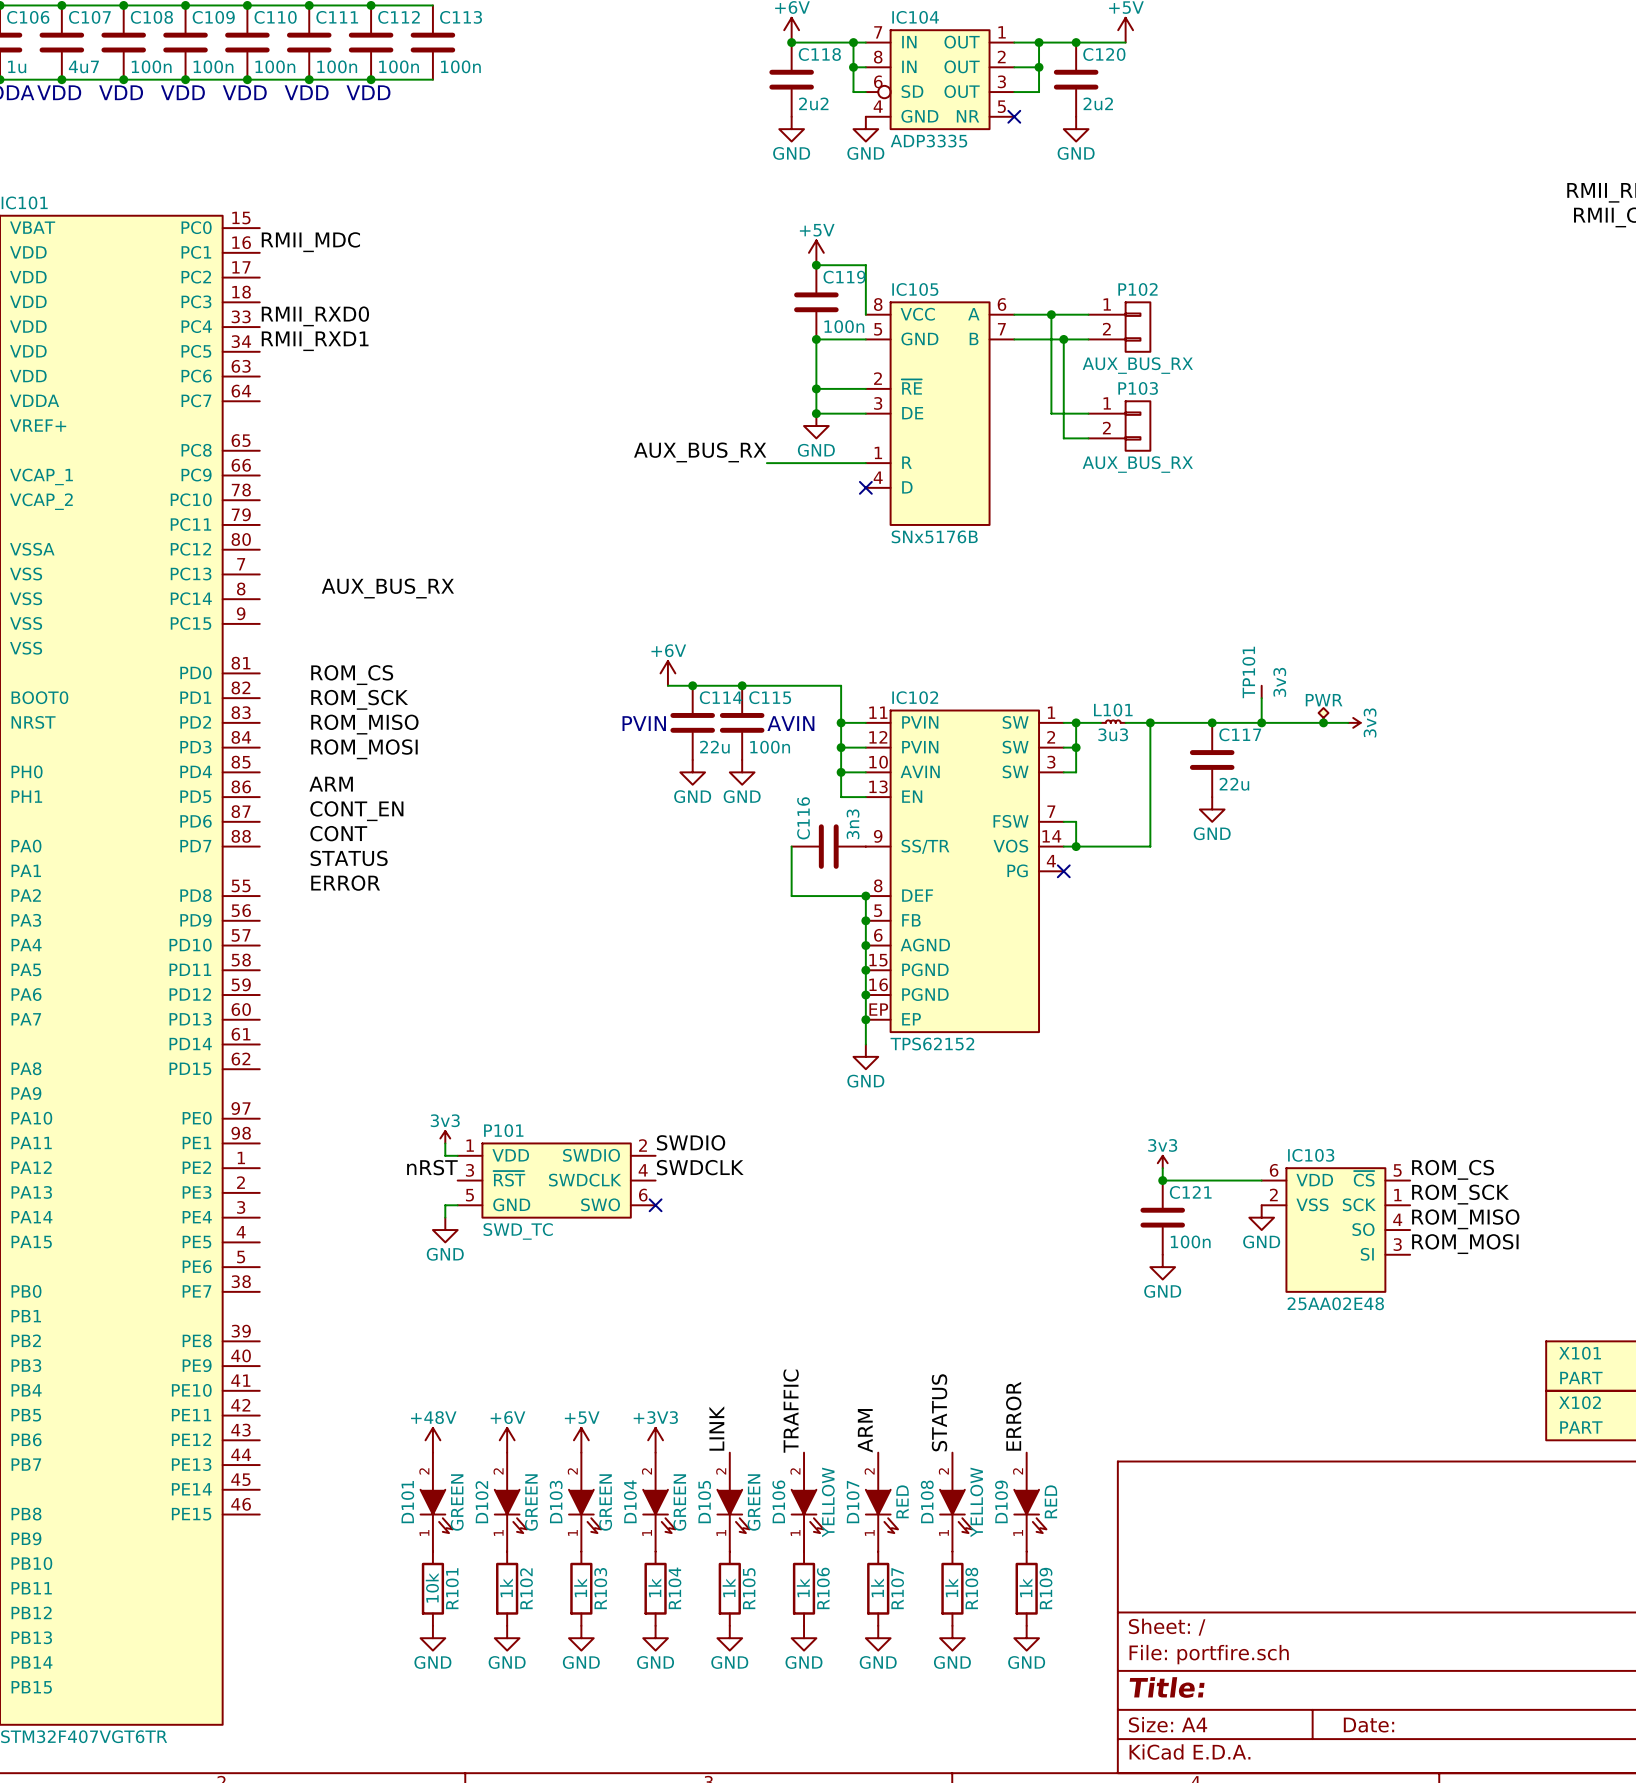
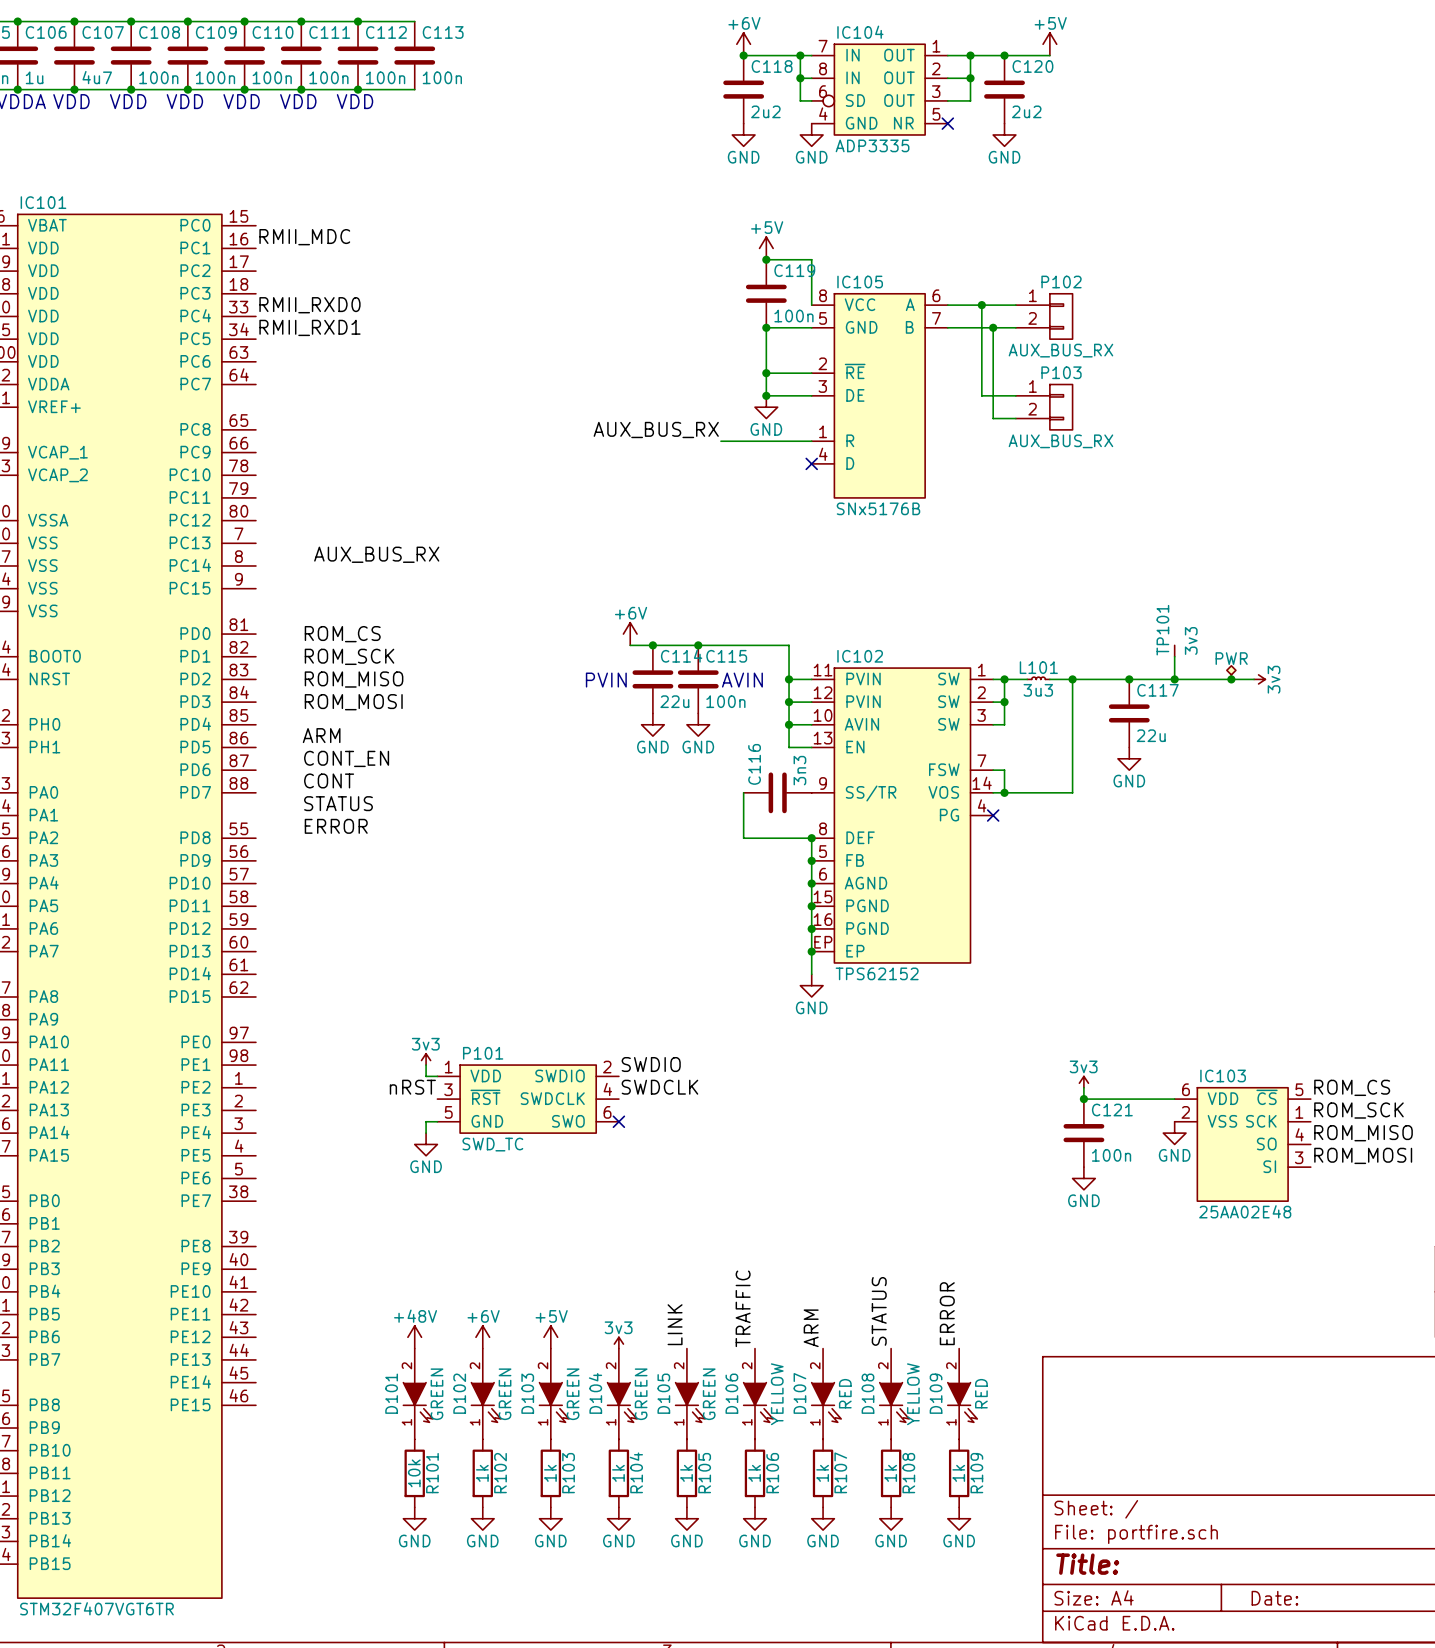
power symbol: +3V3 (655, 1440) -> 3v3 (618, 1342)

